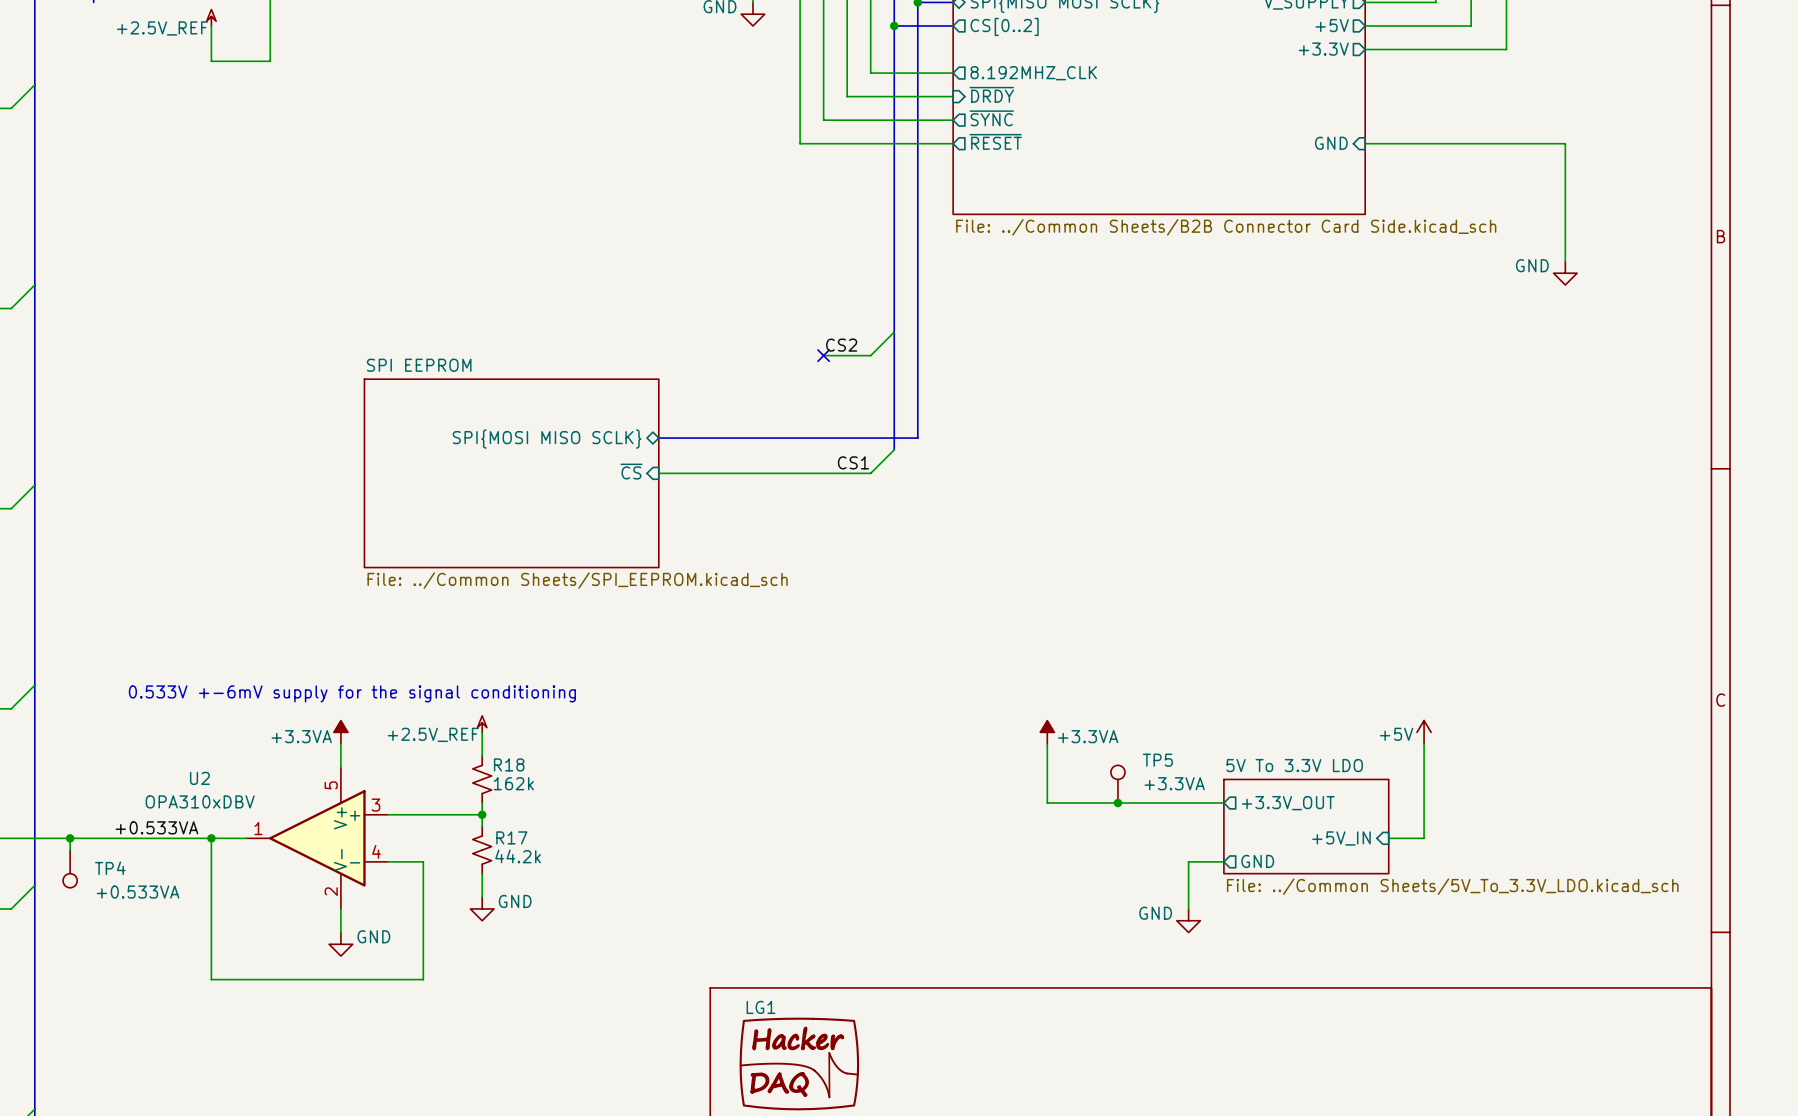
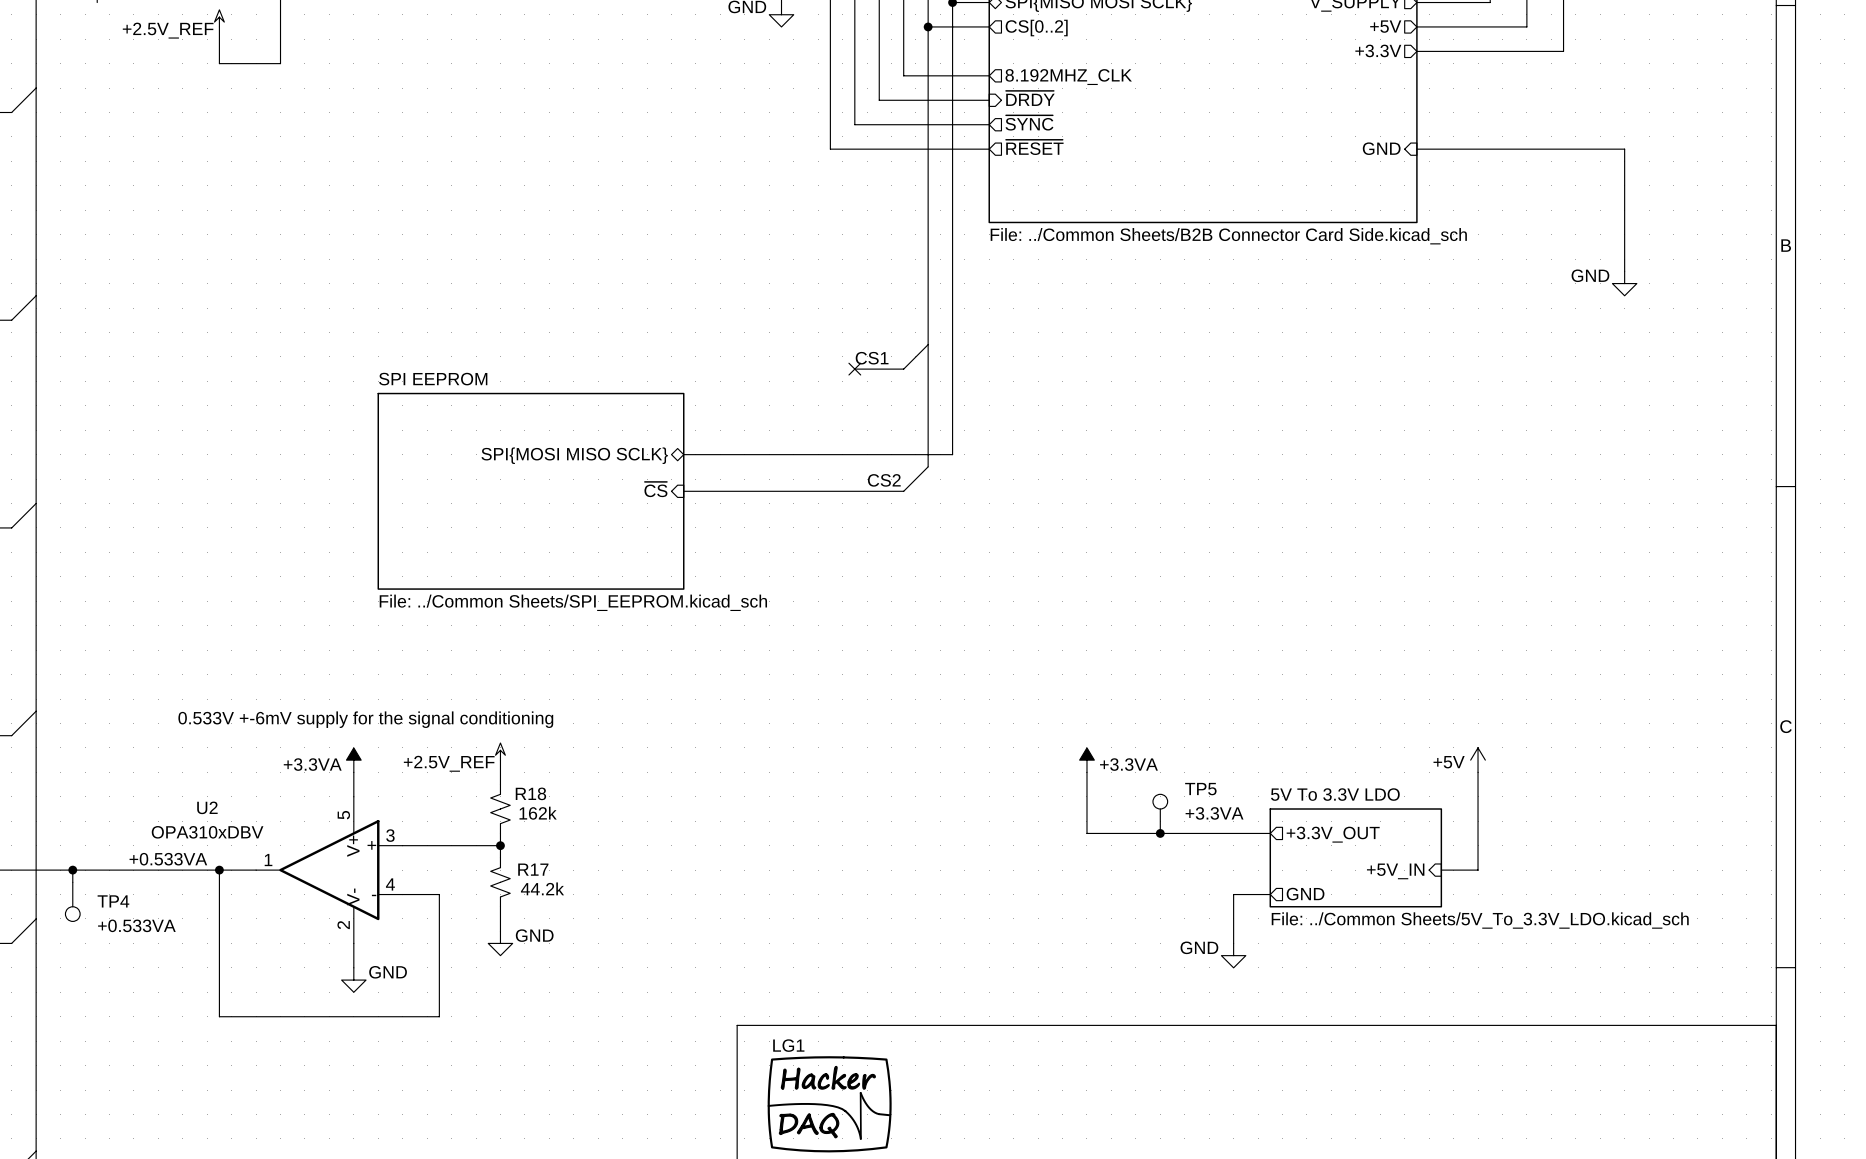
label: CS2 (841, 345) -> CS1 (872, 358)
label: CS1 (853, 462) -> CS2 (884, 480)

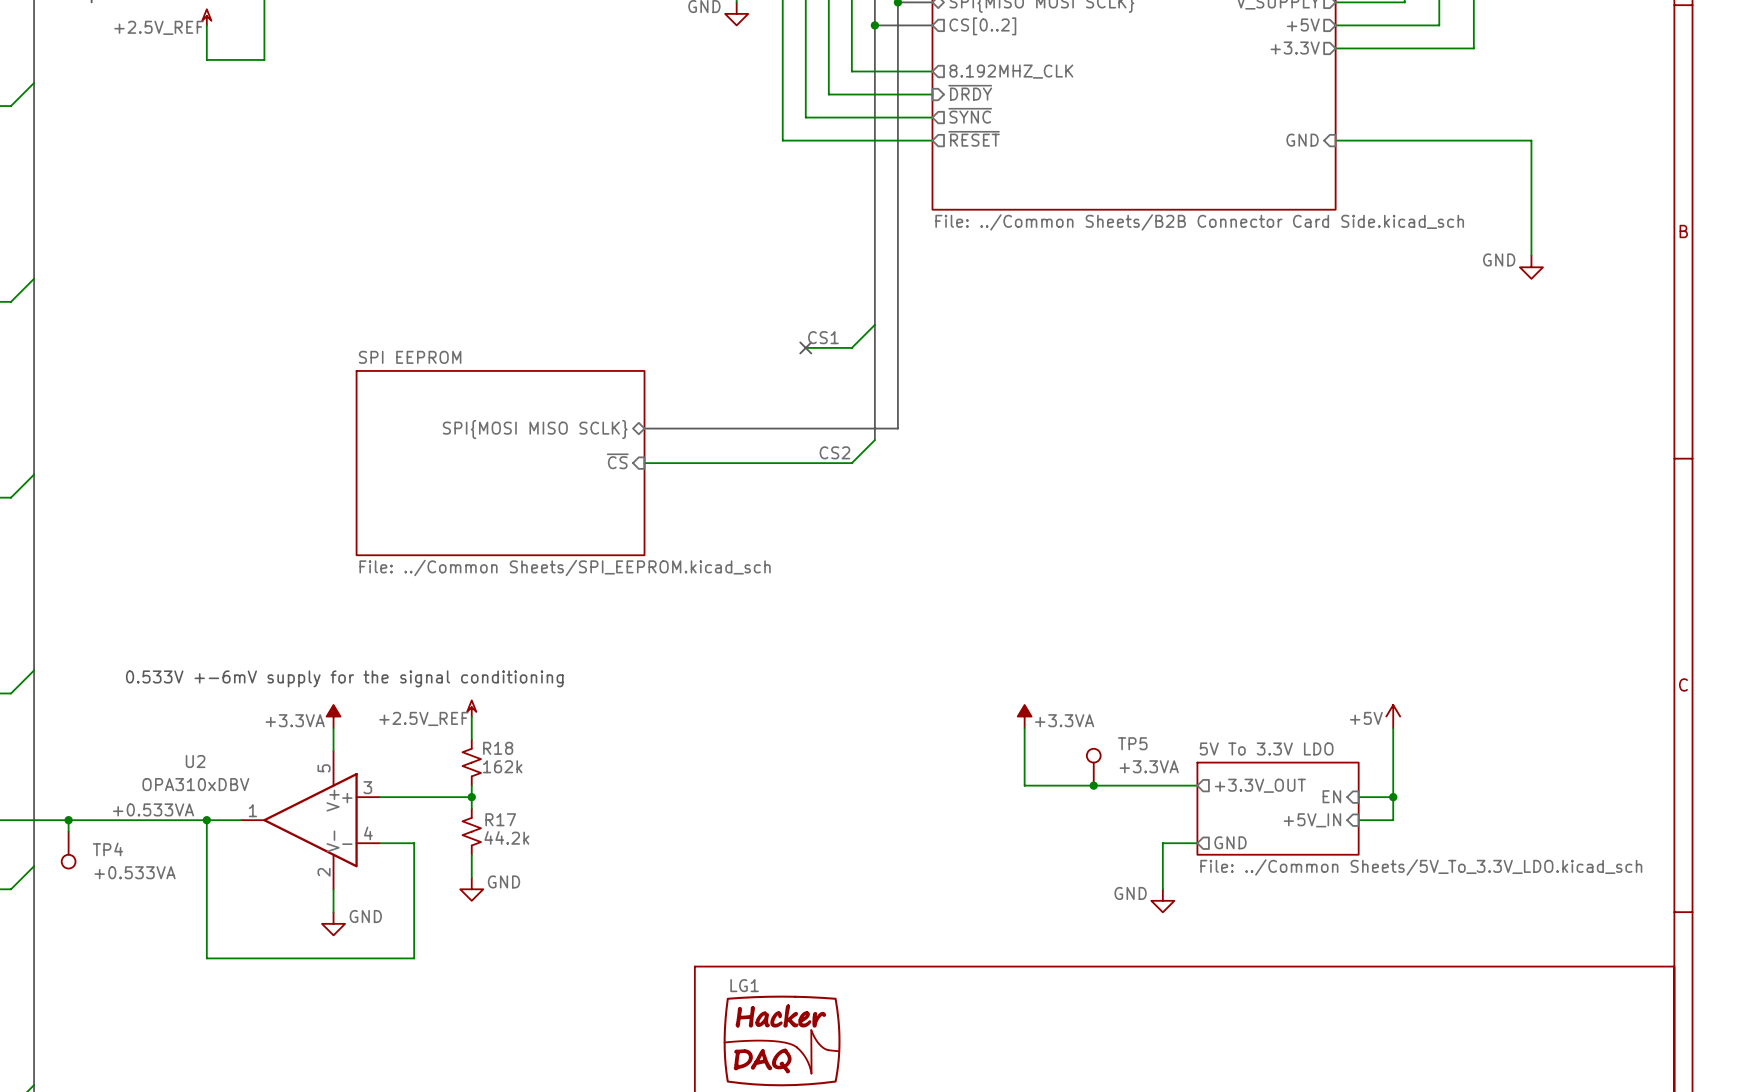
sheet pin: none -> EN (1331, 796)
wire: none -> (1358, 797) (1393, 797)
junction: none -> (1393, 797)

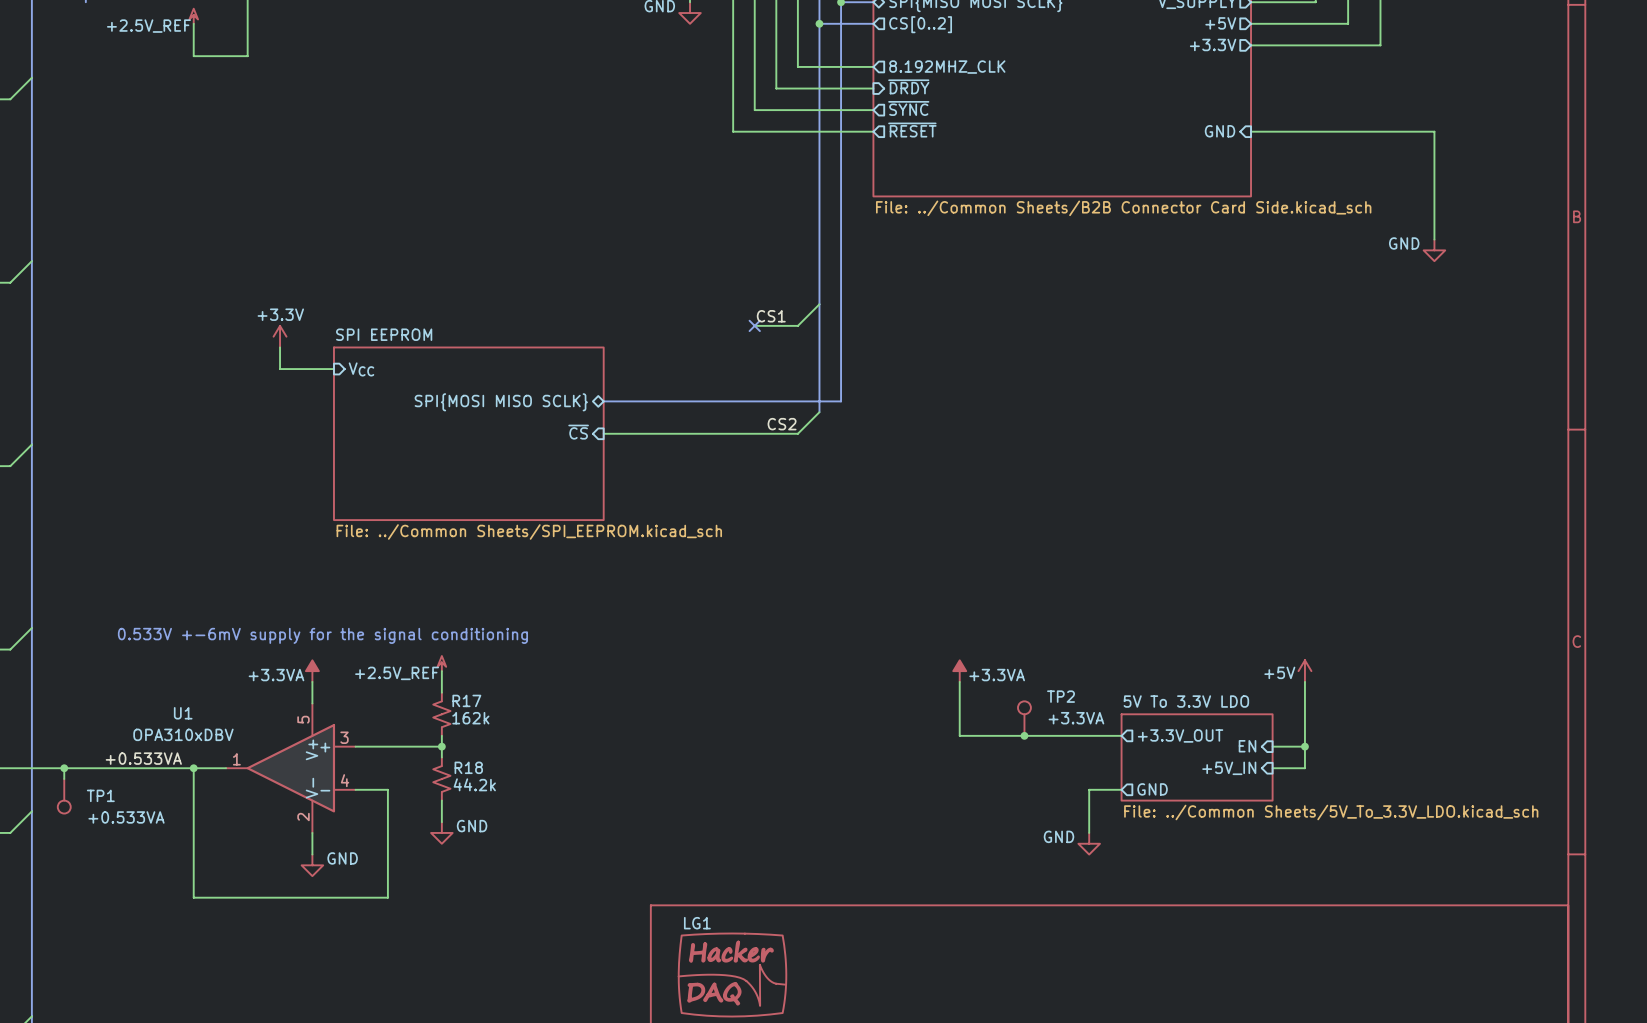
power symbol: none -> +3.3V (280, 336)
wire: none -> (280, 347) (280, 369) (333, 369)
sheet pin: none -> VCC (361, 369)
TP5 name: TP5 (1132, 743) -> TP2 (1061, 696)
R18 name: R18 (498, 748) -> R17 (466, 700)
U2 name: U2 (195, 761) -> U1 (183, 713)
R17 name: R17 (500, 819) -> R18 (468, 767)
TP4 name: TP4 (107, 849) -> TP1 (100, 795)

